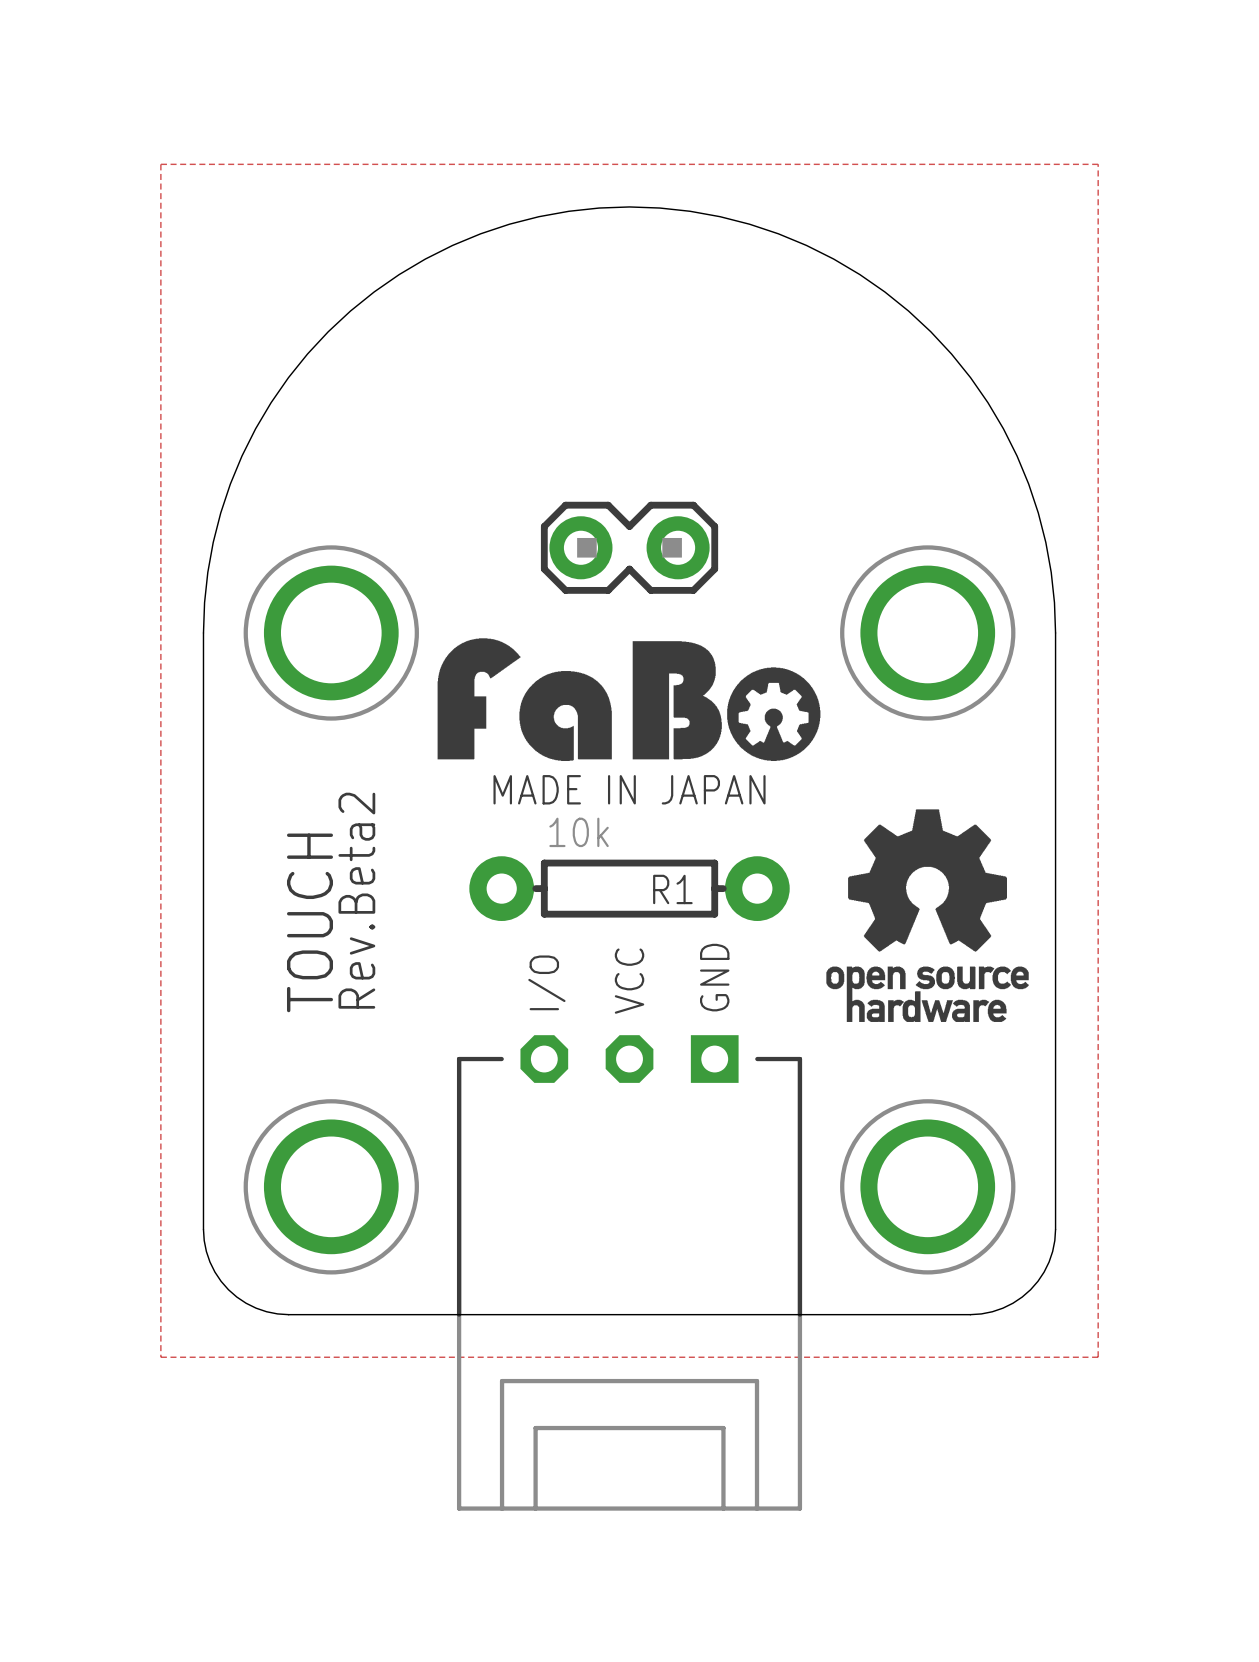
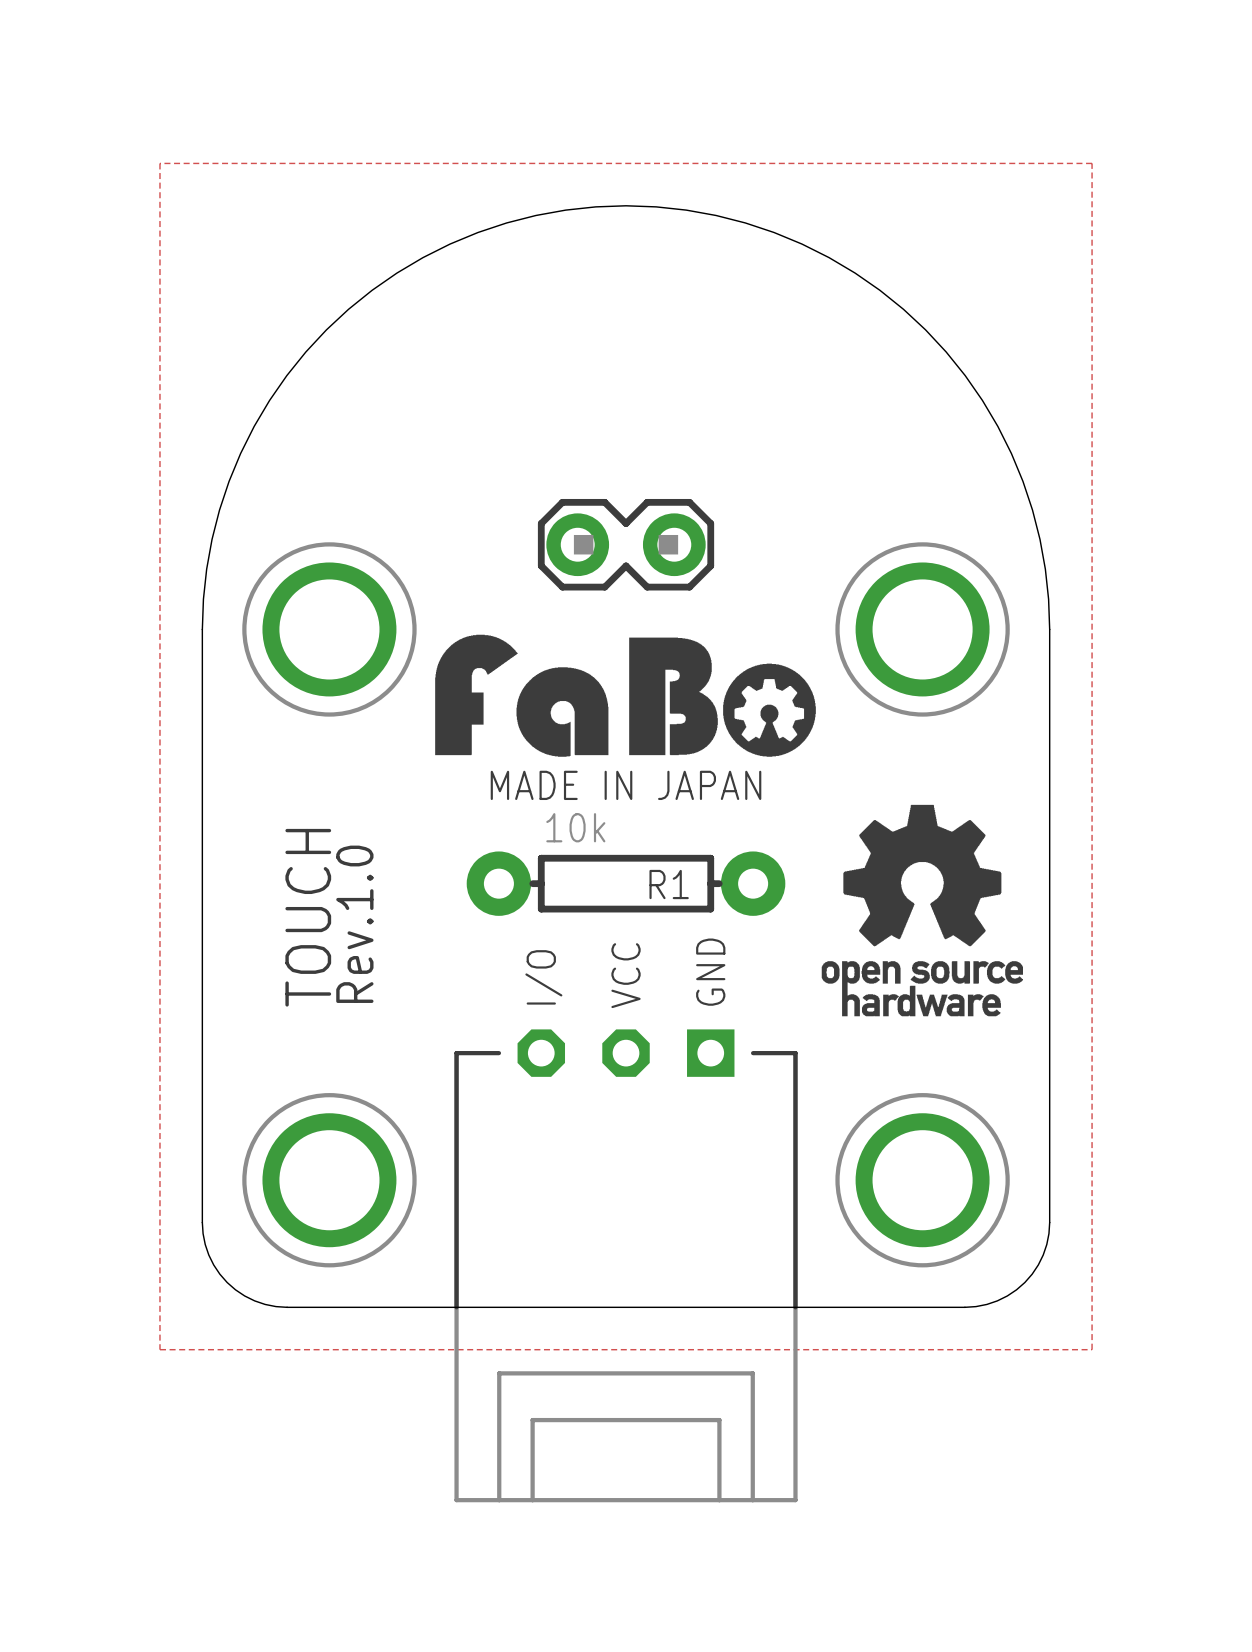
text: Rev.Beta2 (356, 900) -> Rev.1.0 (354, 924)

